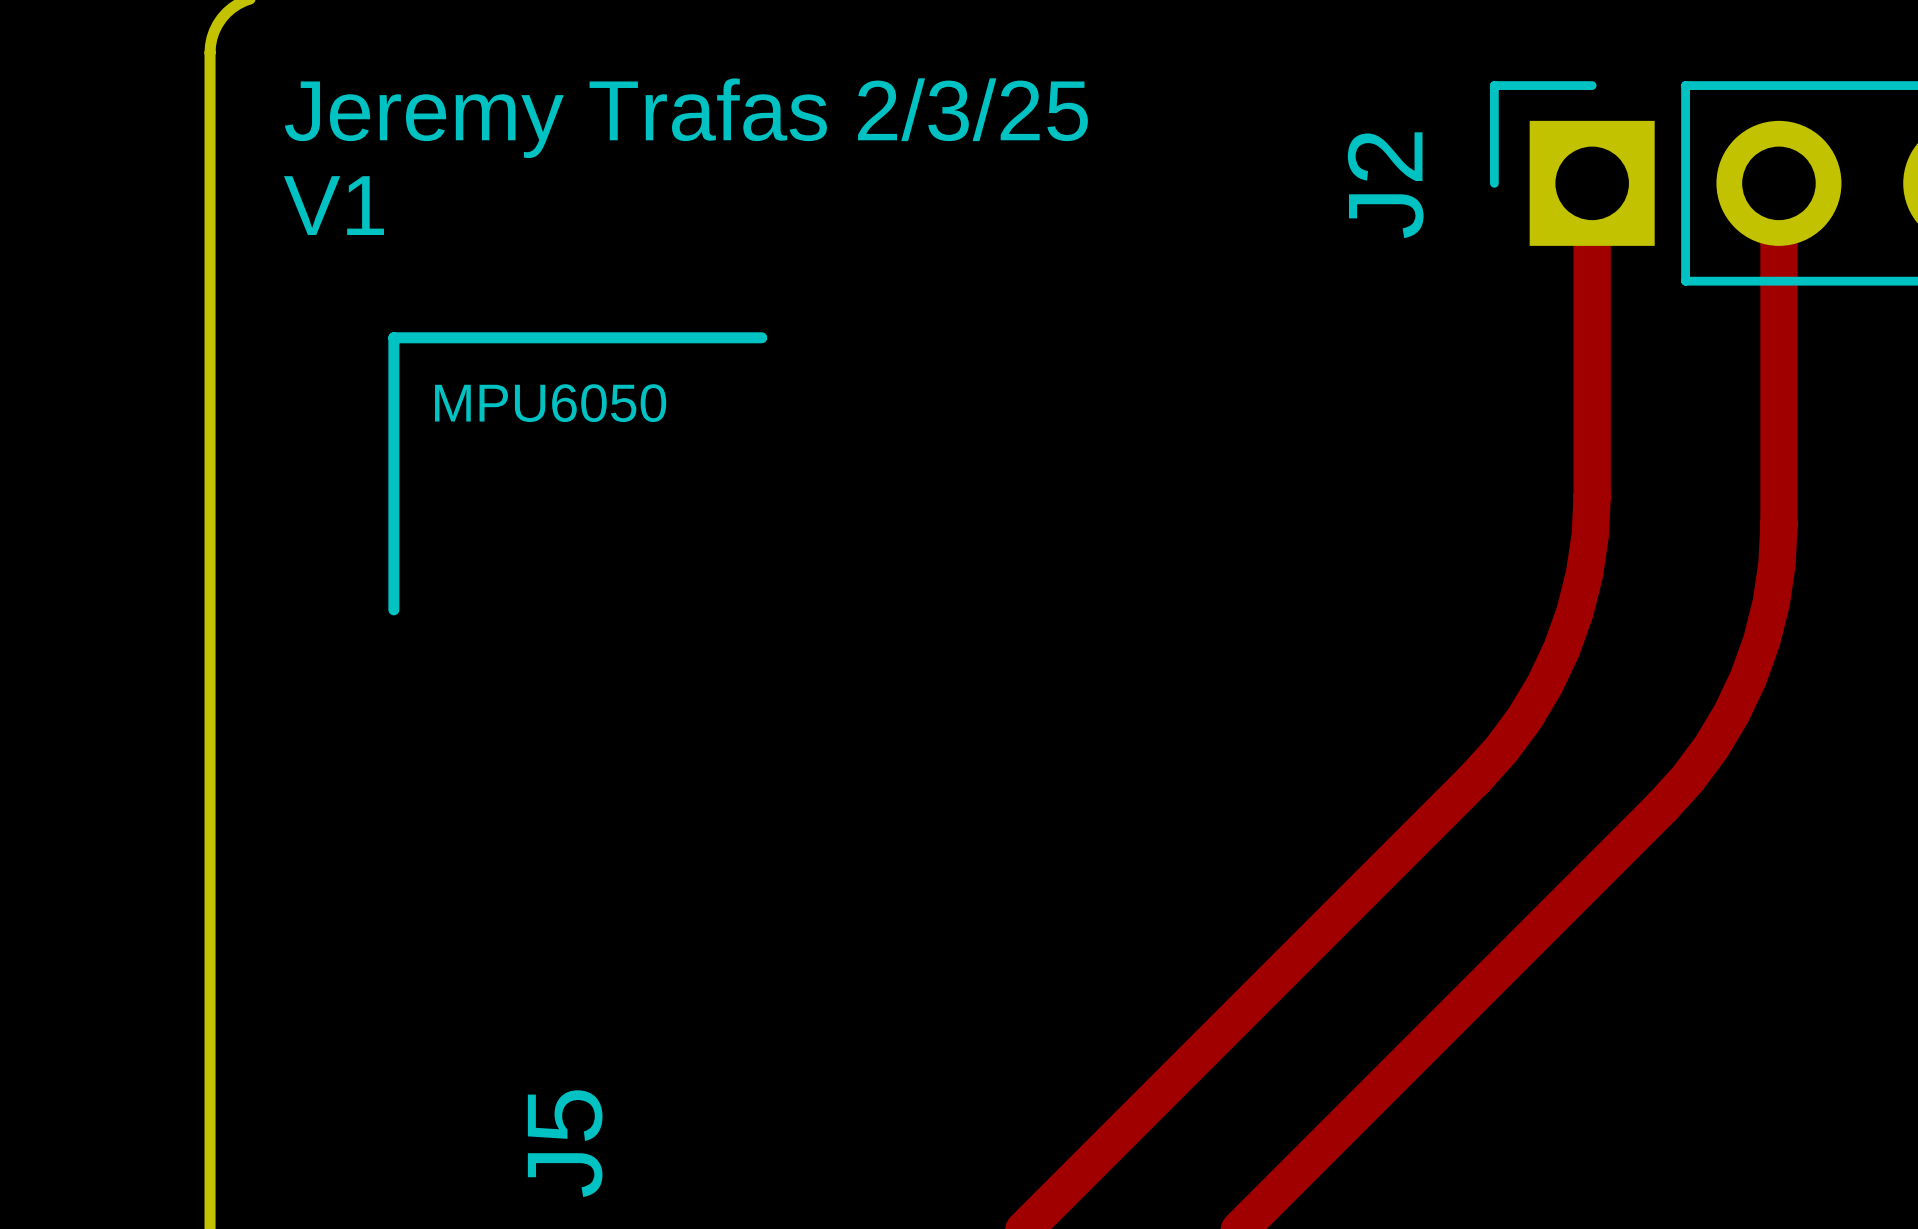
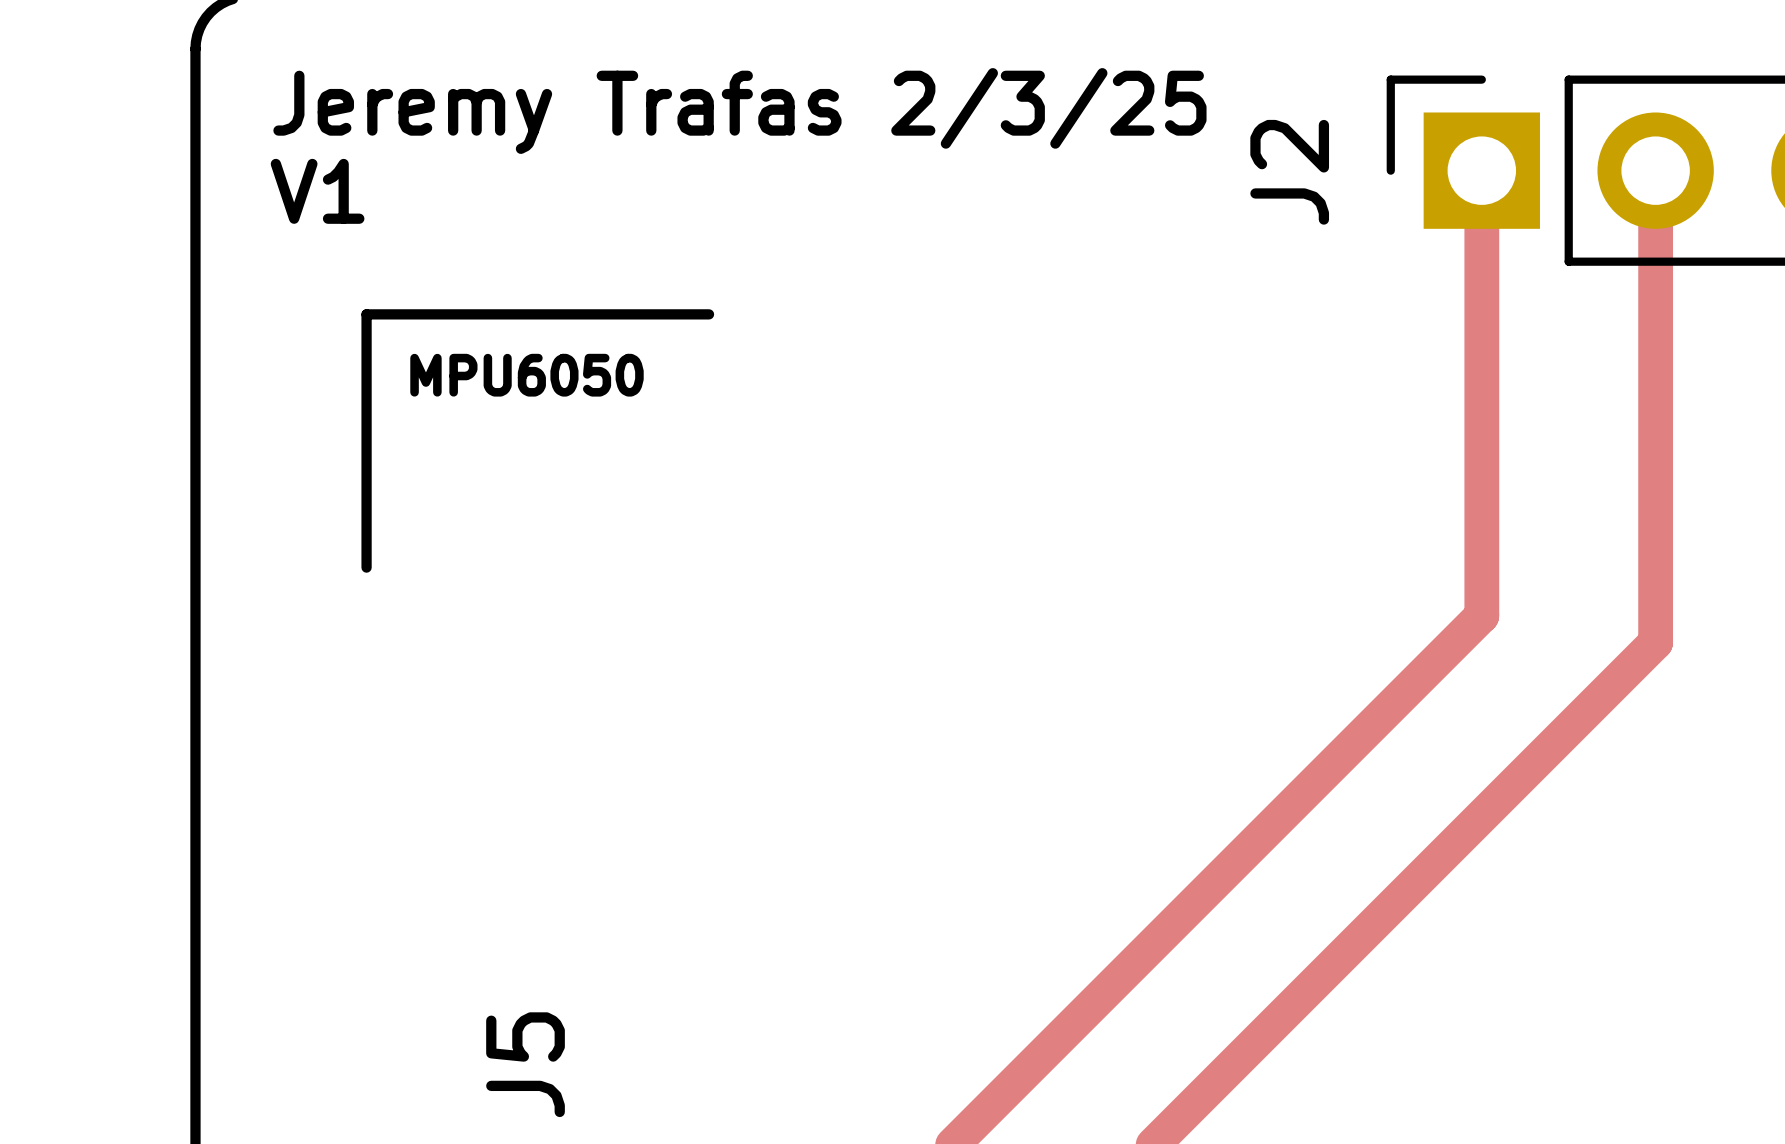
track: (1592, 495) (1590, 535) (1584, 573) (1574, 612) (1561, 649) (1544, 684) (1524, 718) (1501, 749) (1474, 778) -> (1481, 461) (1481, 615) (1372, 724)
track: (1778, 524) (1777, 563) (1771, 602) (1761, 640) (1748, 677) (1731, 713) (1711, 746) (1688, 778) (1661, 807) -> (1655, 488) (1655, 642) (1546, 751)

